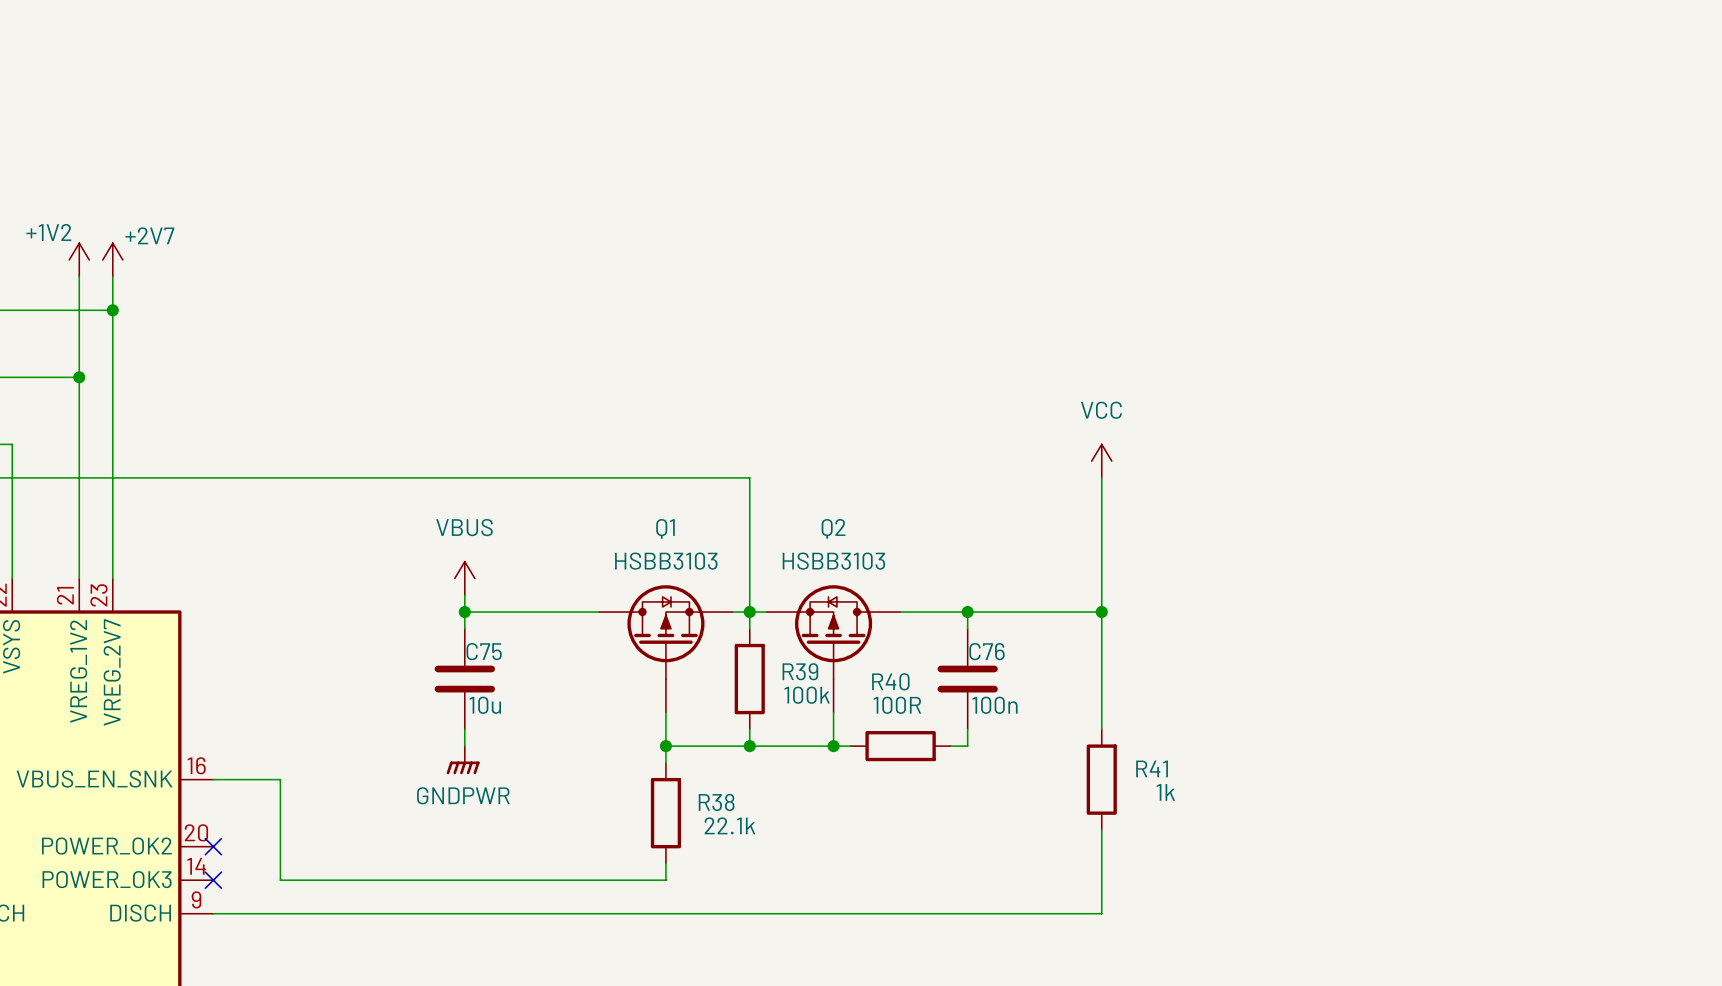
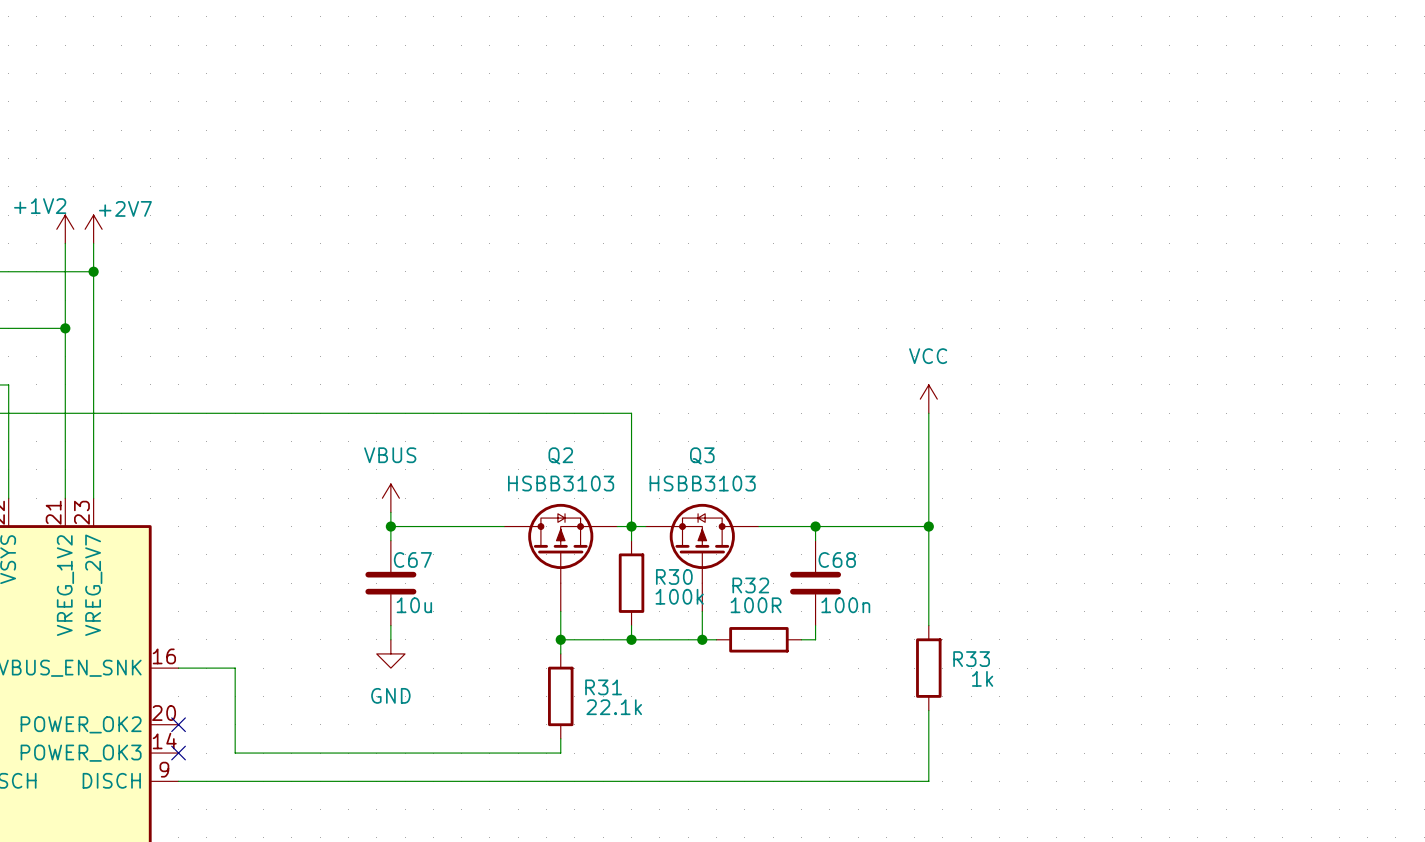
Q1 name: Q1 (665, 528) -> Q2 (560, 455)
Q2 name: Q2 (833, 528) -> Q3 (702, 455)
C75 name: C75 (484, 651) -> C67 (412, 559)
C76 name: C76 (987, 651) -> C68 (837, 559)
R39 name: R39 (800, 671) -> R30 (674, 576)
R40 name: R40 (890, 681) -> R32 (750, 585)
power symbol: GNDPWR (463, 760) -> GND (390, 653)
R41 name: R41 (1152, 768) -> R33 (971, 659)
R38 name: R38 (716, 802) -> R31 (603, 687)

